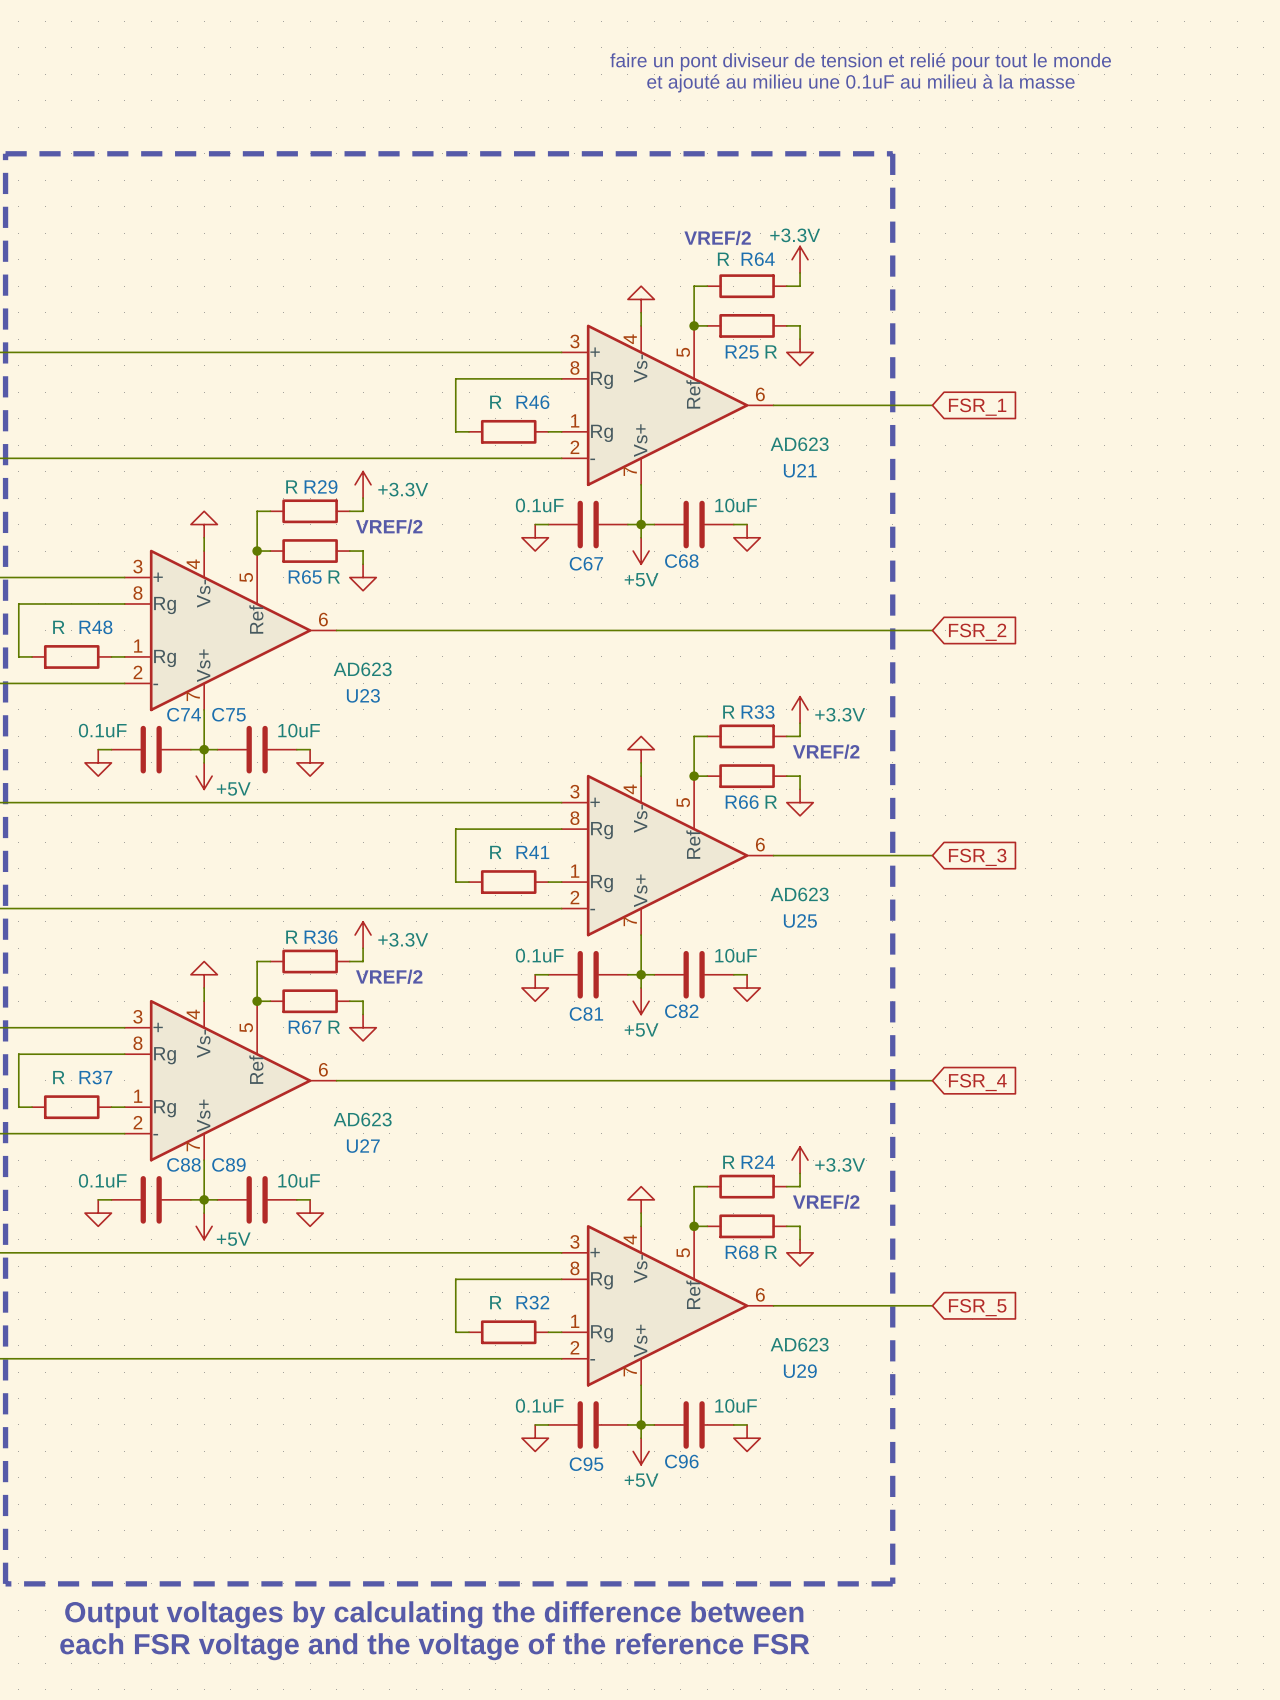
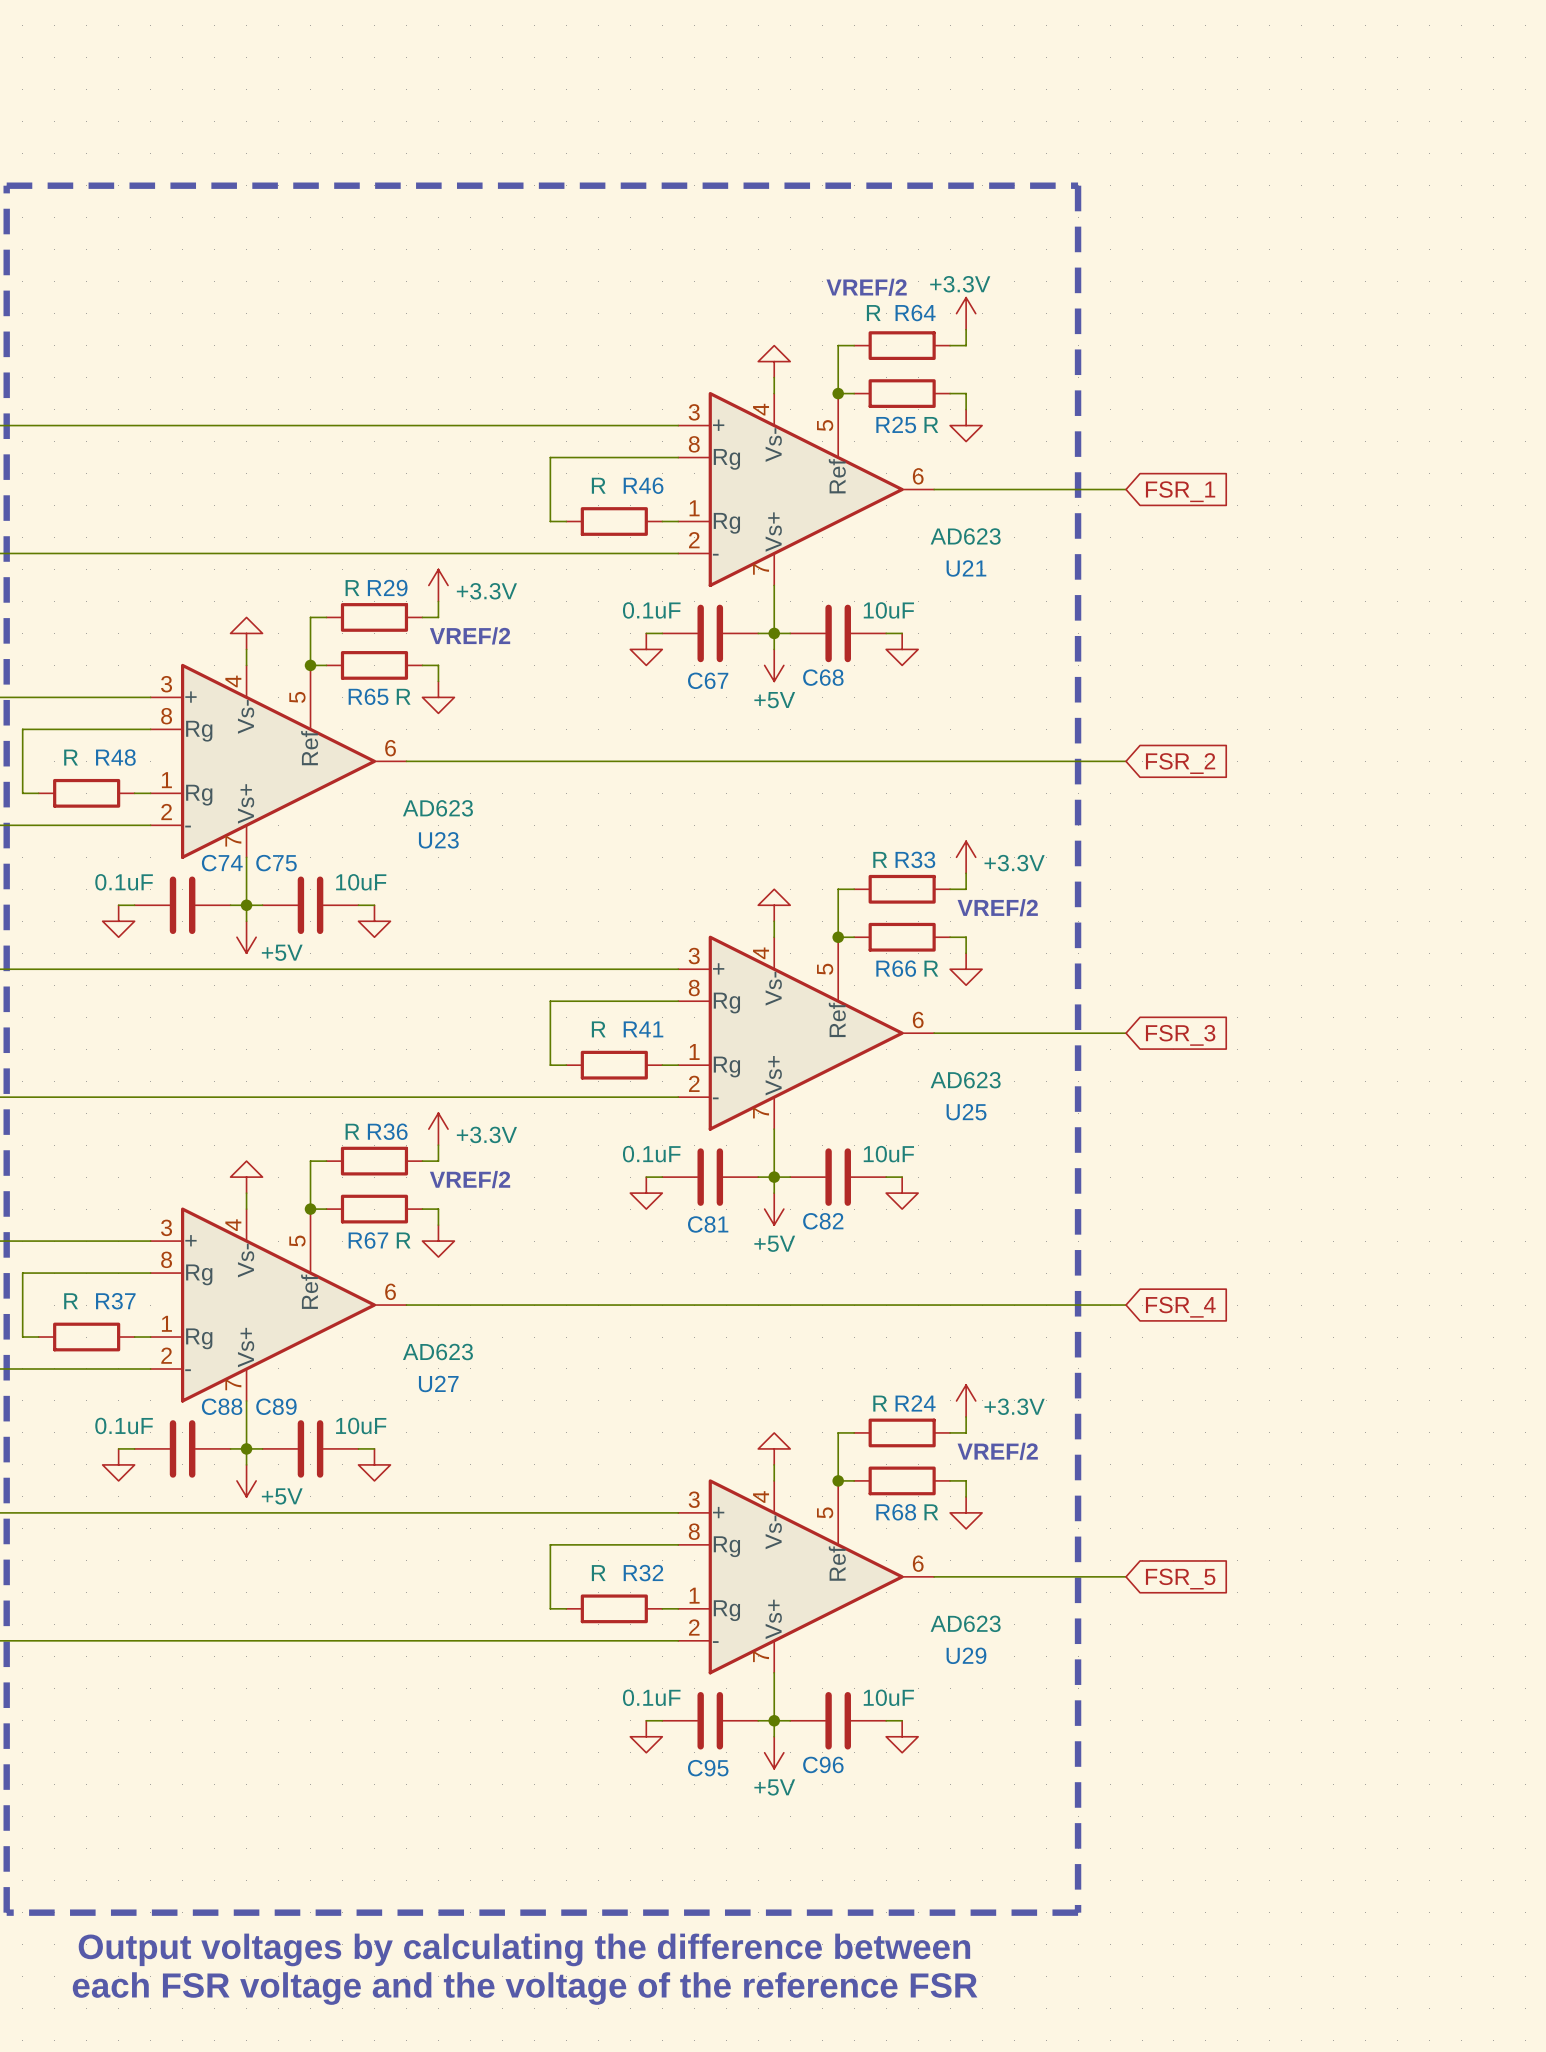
text: faire un pont diviseur de tension et relié pour tout le monde (860, 62) -> none
text: et ajouté au milieu une 0.1uF au milieu à la masse (860, 83) -> none

